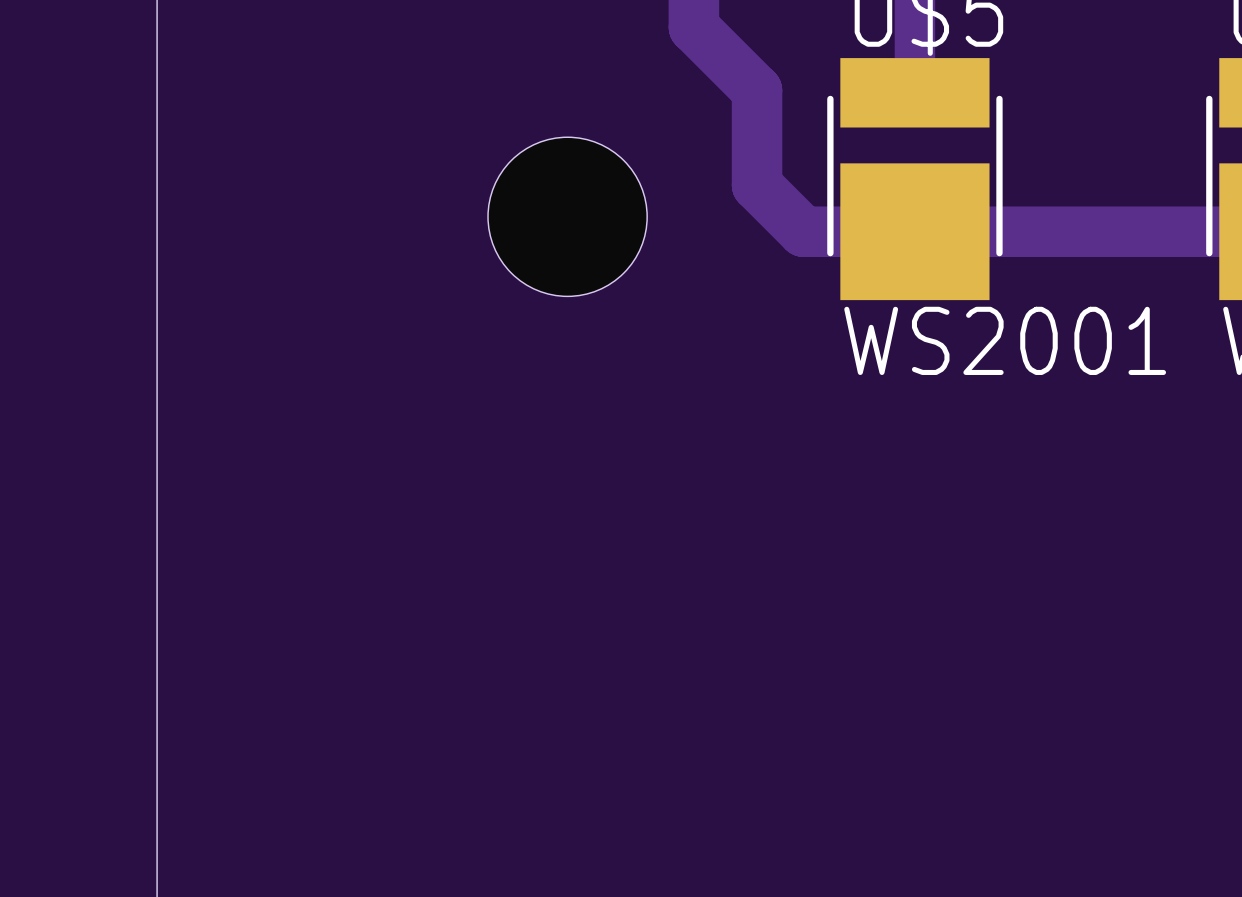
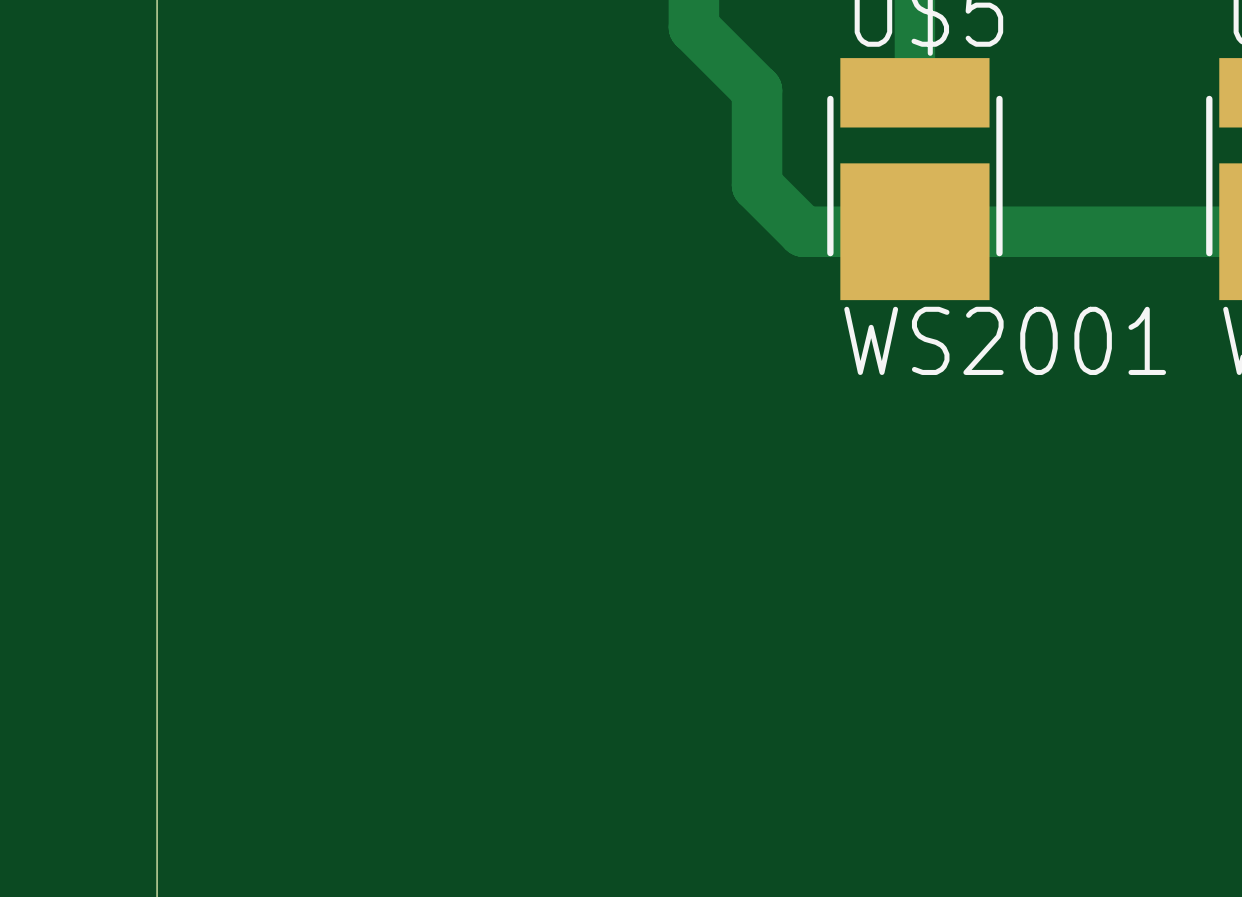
hole: (567, 216) -> none

